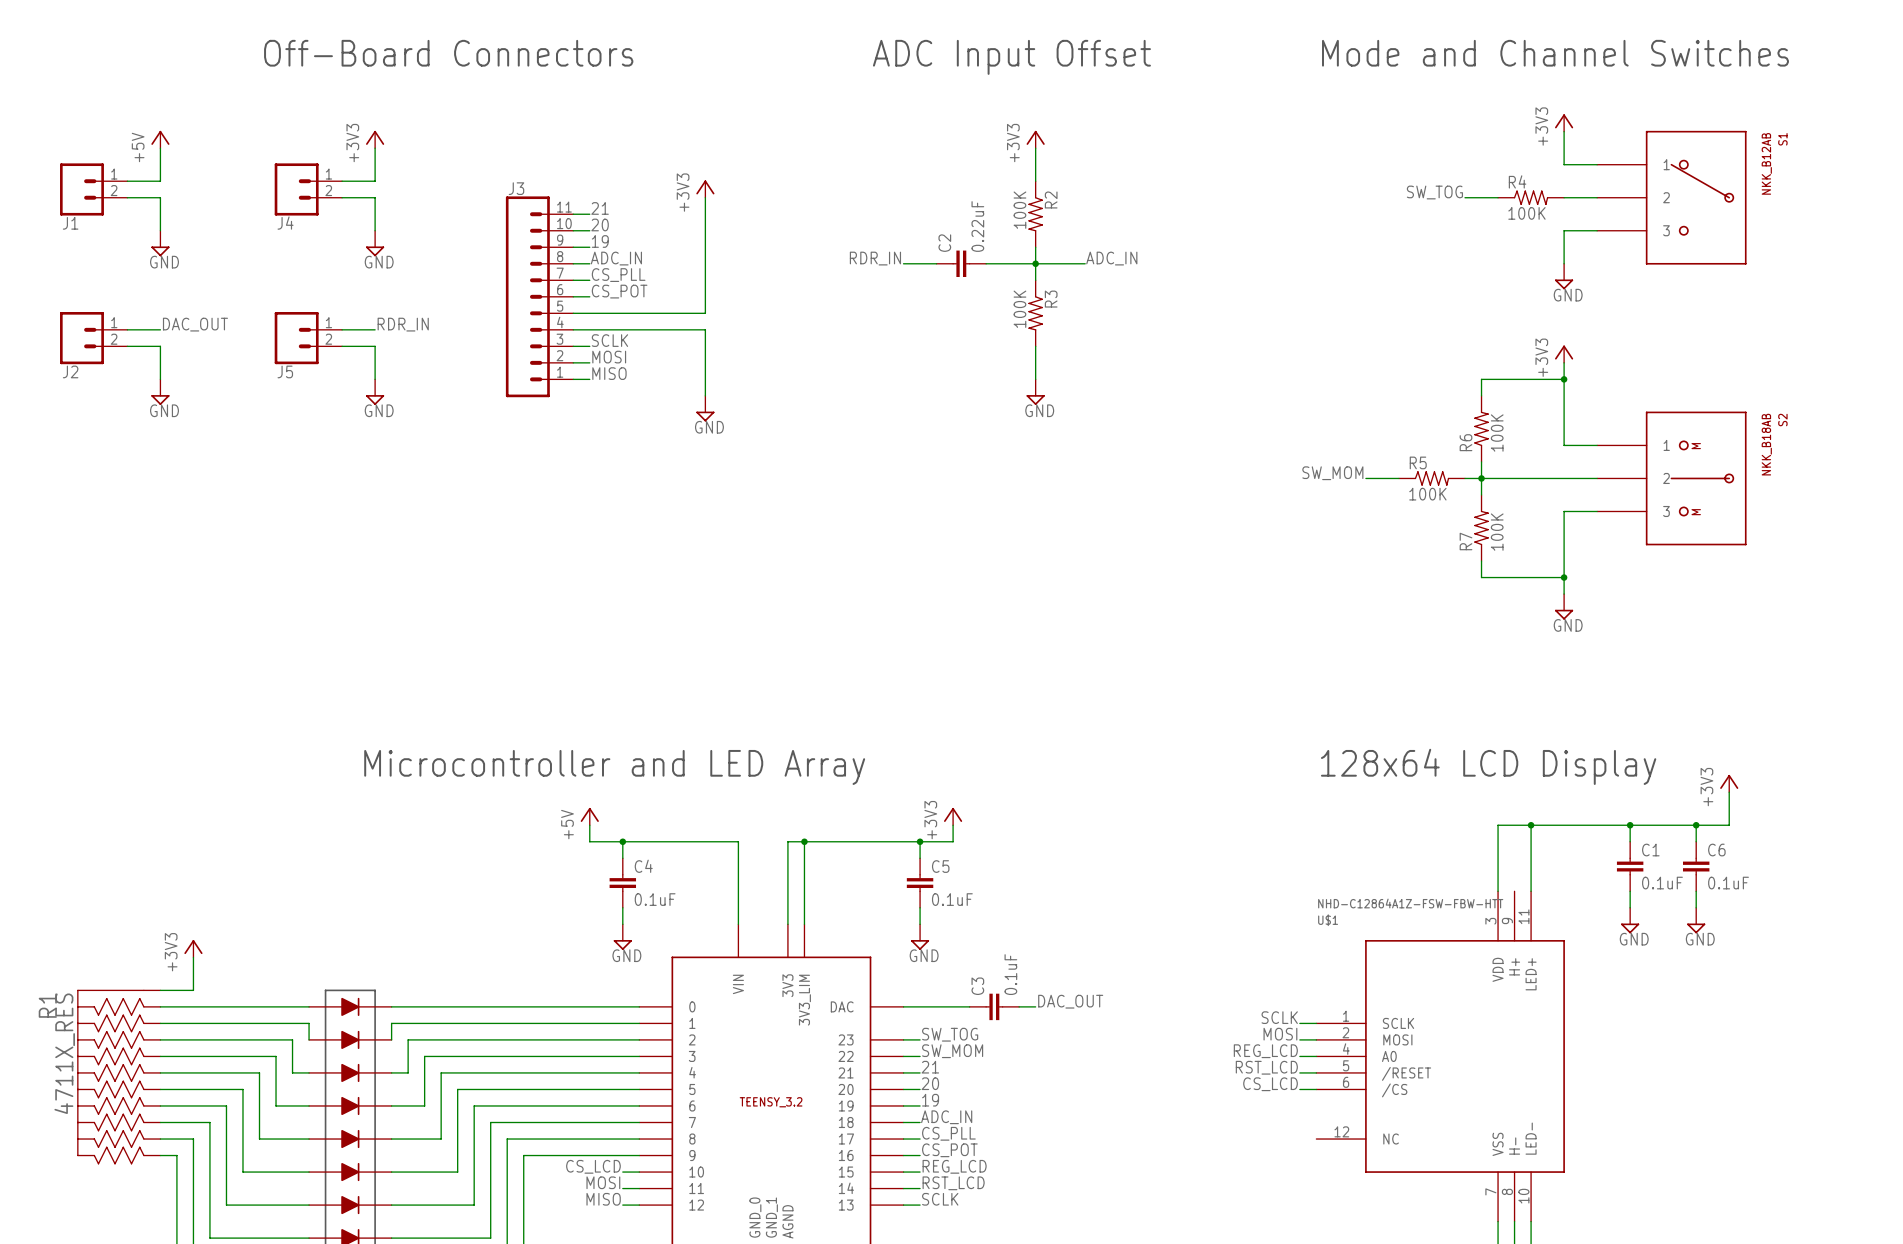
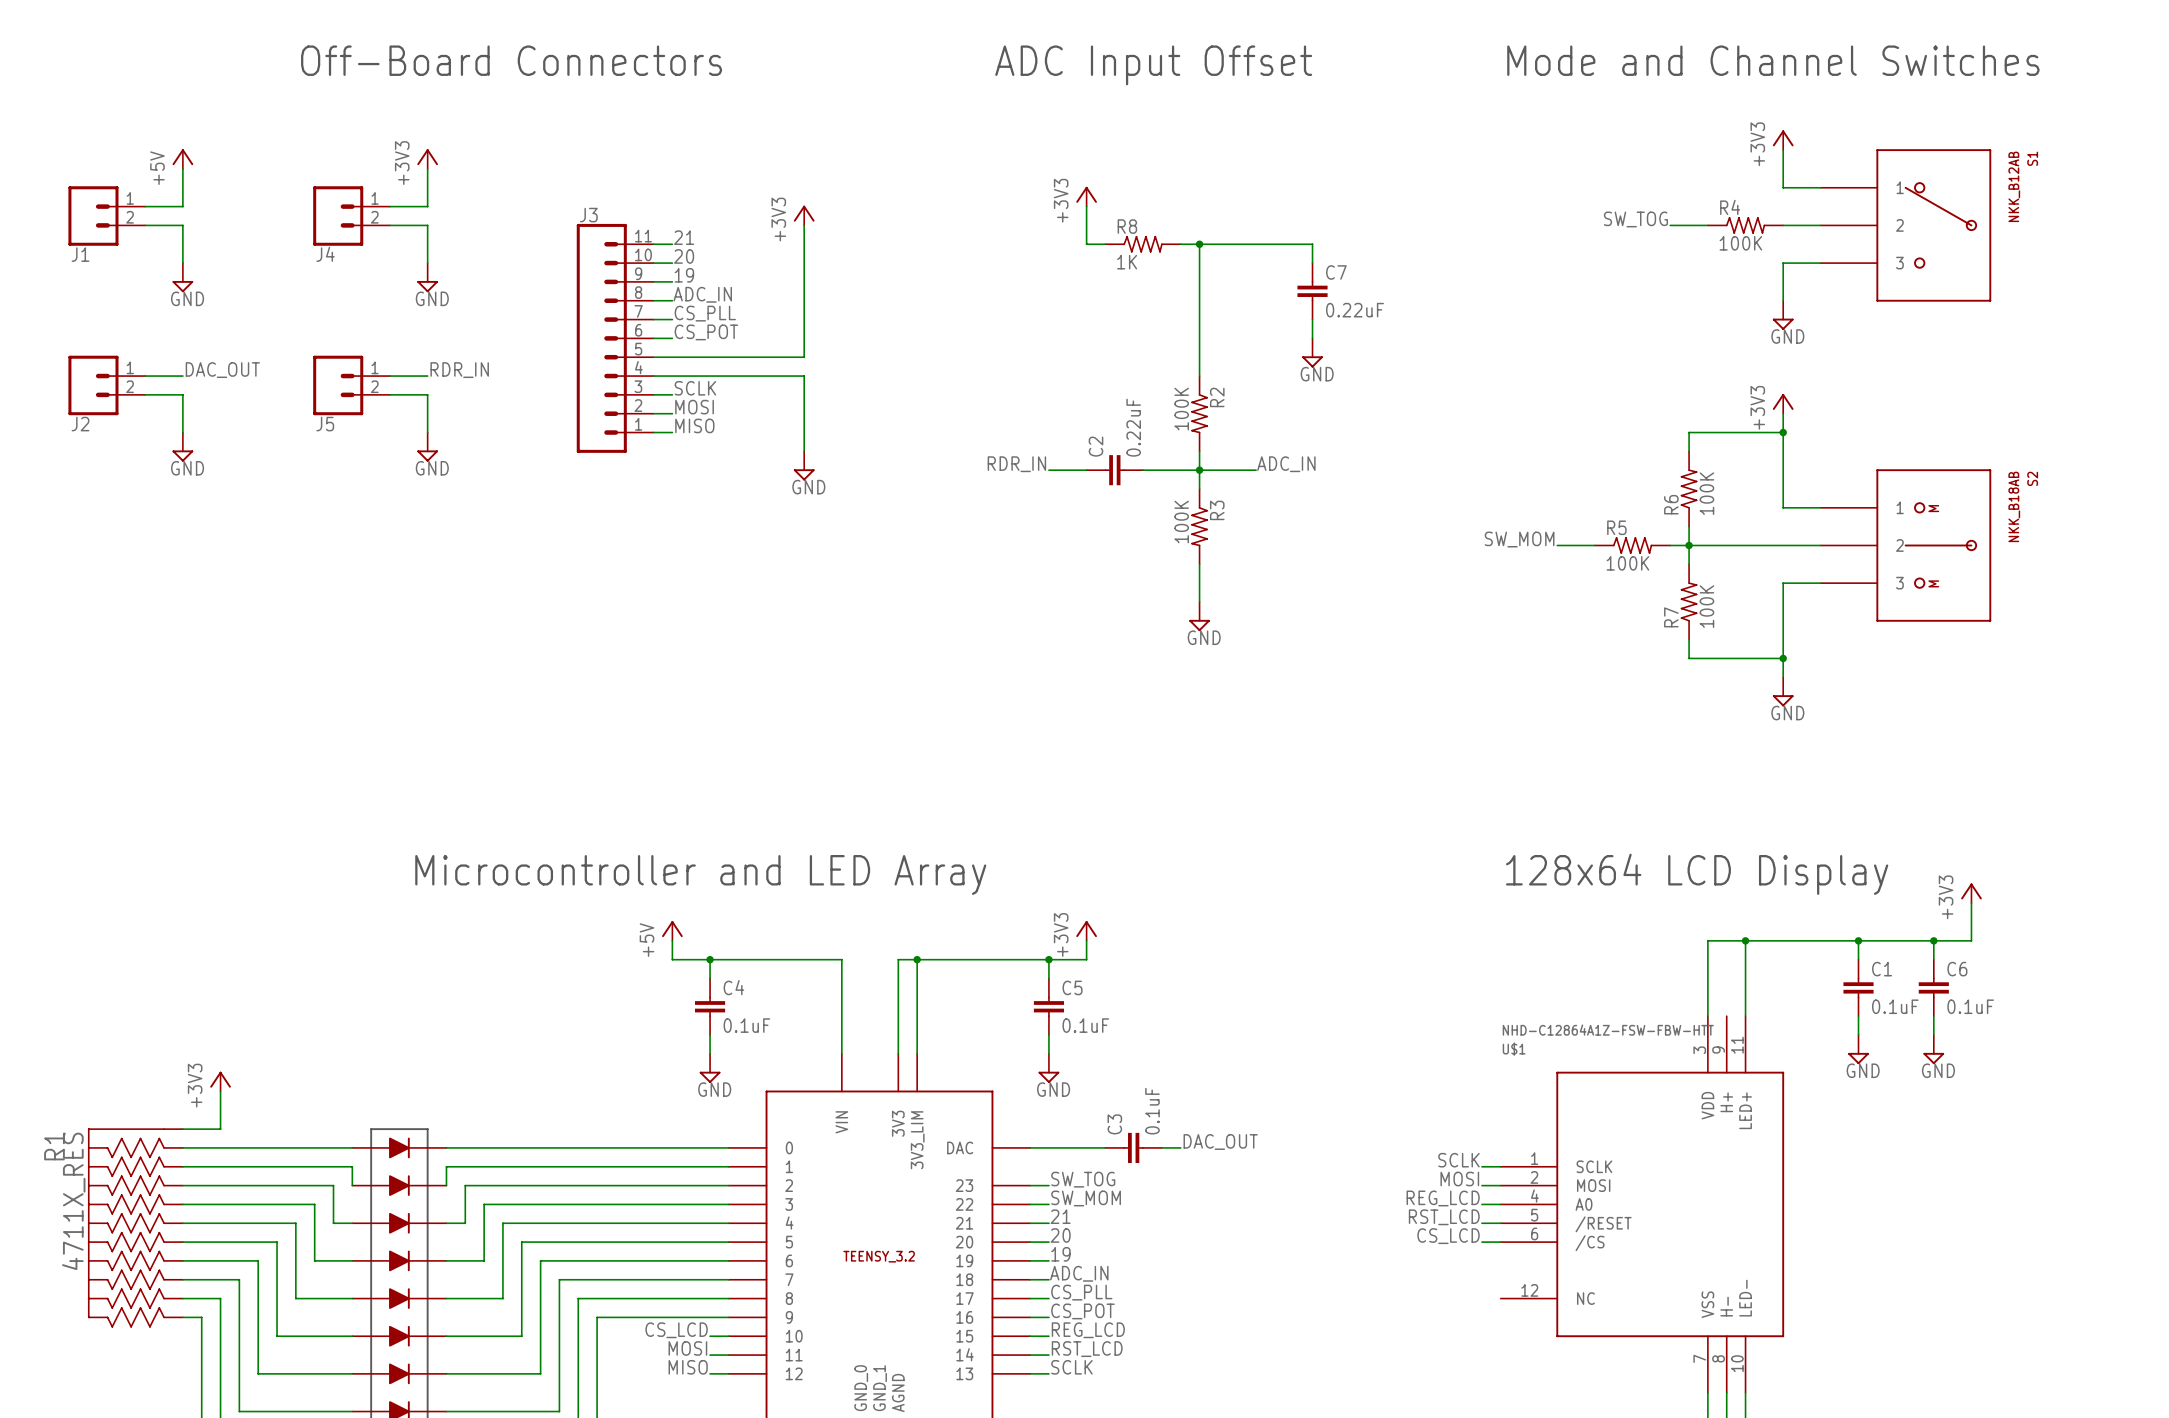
power symbol position: +3V3 (1035, 139) -> +3V3 (1086, 196)
wire: (1035, 148) (1035, 181) -> none
wire: none -> (1086, 206) (1086, 244) (1105, 244)
R8: none -> 1K (1143, 244)
wire: none -> (1180, 244) (1312, 244) (1312, 263)
R2 position: (1035, 214) -> (1199, 413)
wire: none -> (1199, 244) (1199, 376)
junction: none -> (1199, 244)
wire: (1035, 247) (1035, 280) -> (1199, 451) (1199, 489)
C7: none -> 0.22uF (1312, 291)
label position: RDR_IN (875, 258) -> RDR_IN (1016, 464)
label position: ADC_IN (1111, 258) -> ADC_IN (1286, 464)
wire: (903, 263) (936, 263) -> (1048, 470) (1086, 470)
C2 position: (961, 263) -> (1114, 470)
wire: (986, 263) (1085, 263) -> (1143, 470) (1256, 470)
junction: (1035, 263) -> none
wire: none -> (1312, 319) (1312, 338)
power symbol: none -> GND (1312, 352)
R3 position: (1035, 313) -> (1199, 526)
wire: (1035, 346) (1035, 379) -> (1199, 564) (1199, 601)
power symbol: GND (1035, 392) -> none
junction: none -> (1199, 470)
power symbol: none -> GND (1199, 616)

